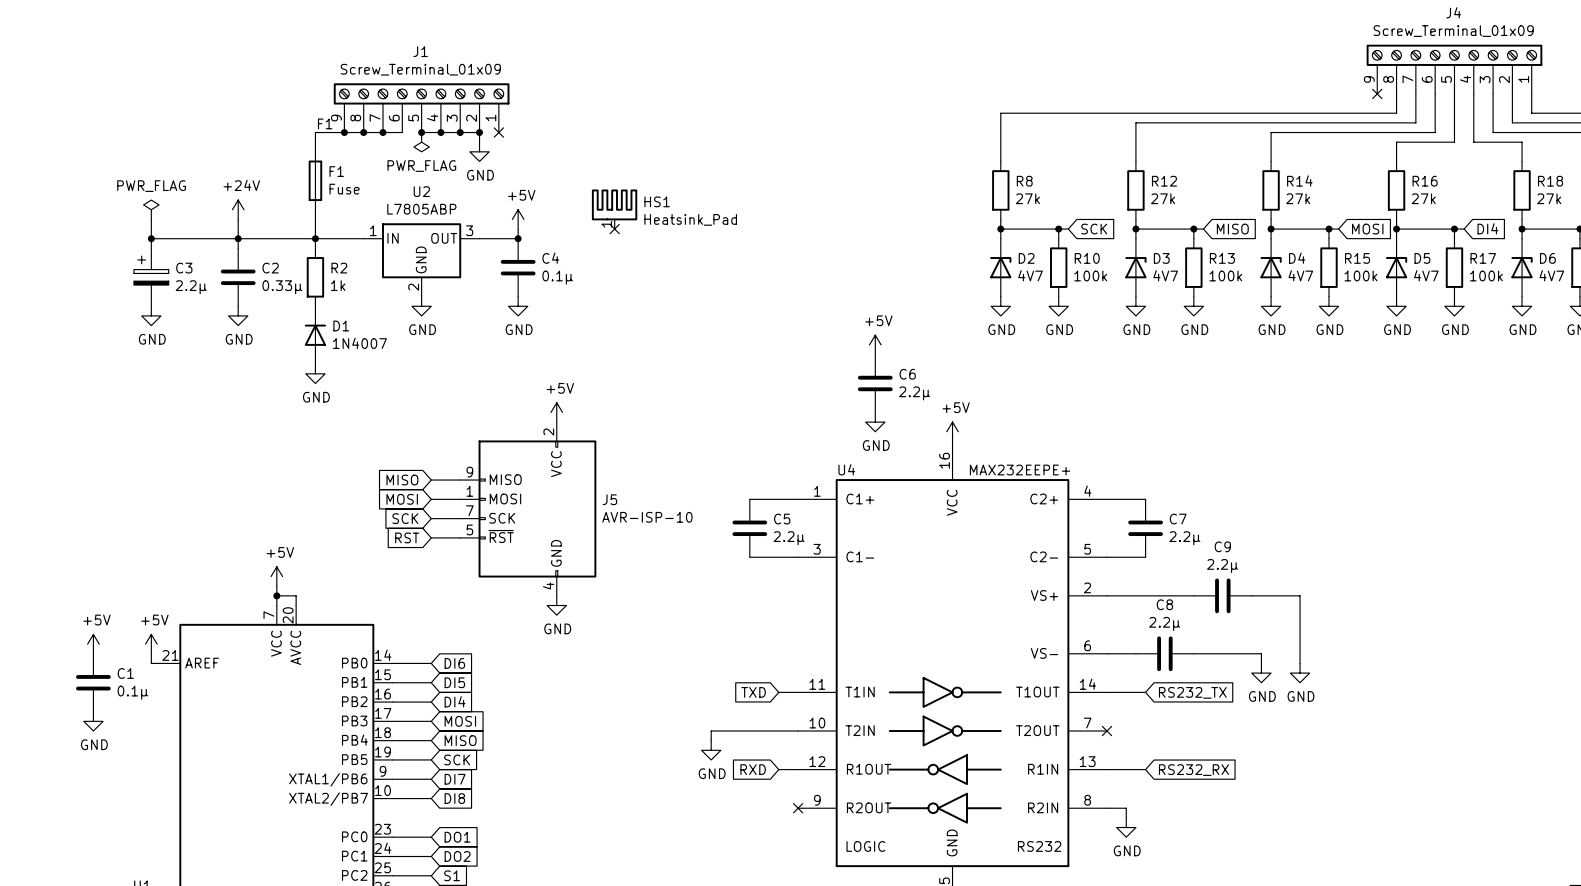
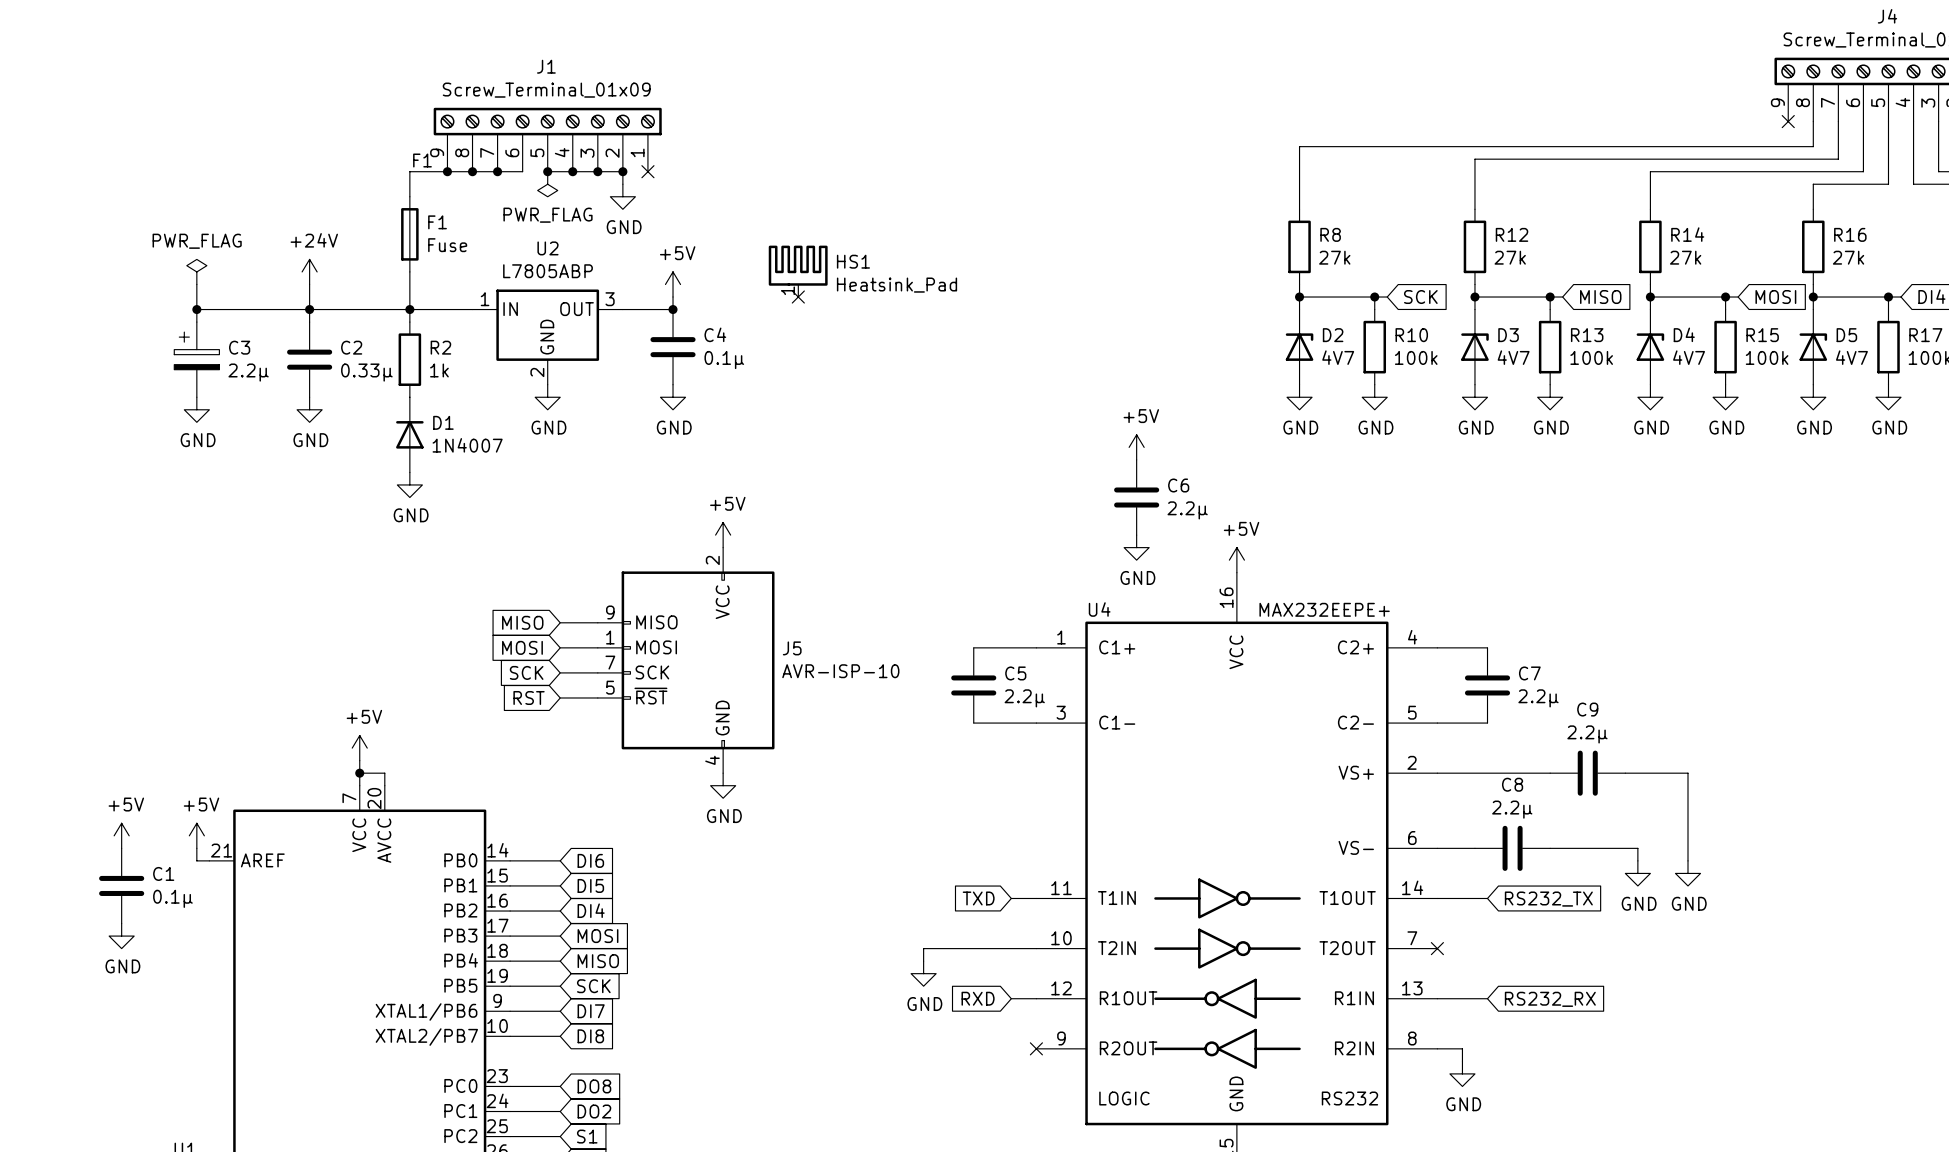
global label: DO1 (457, 837) -> DO8 (594, 1086)

